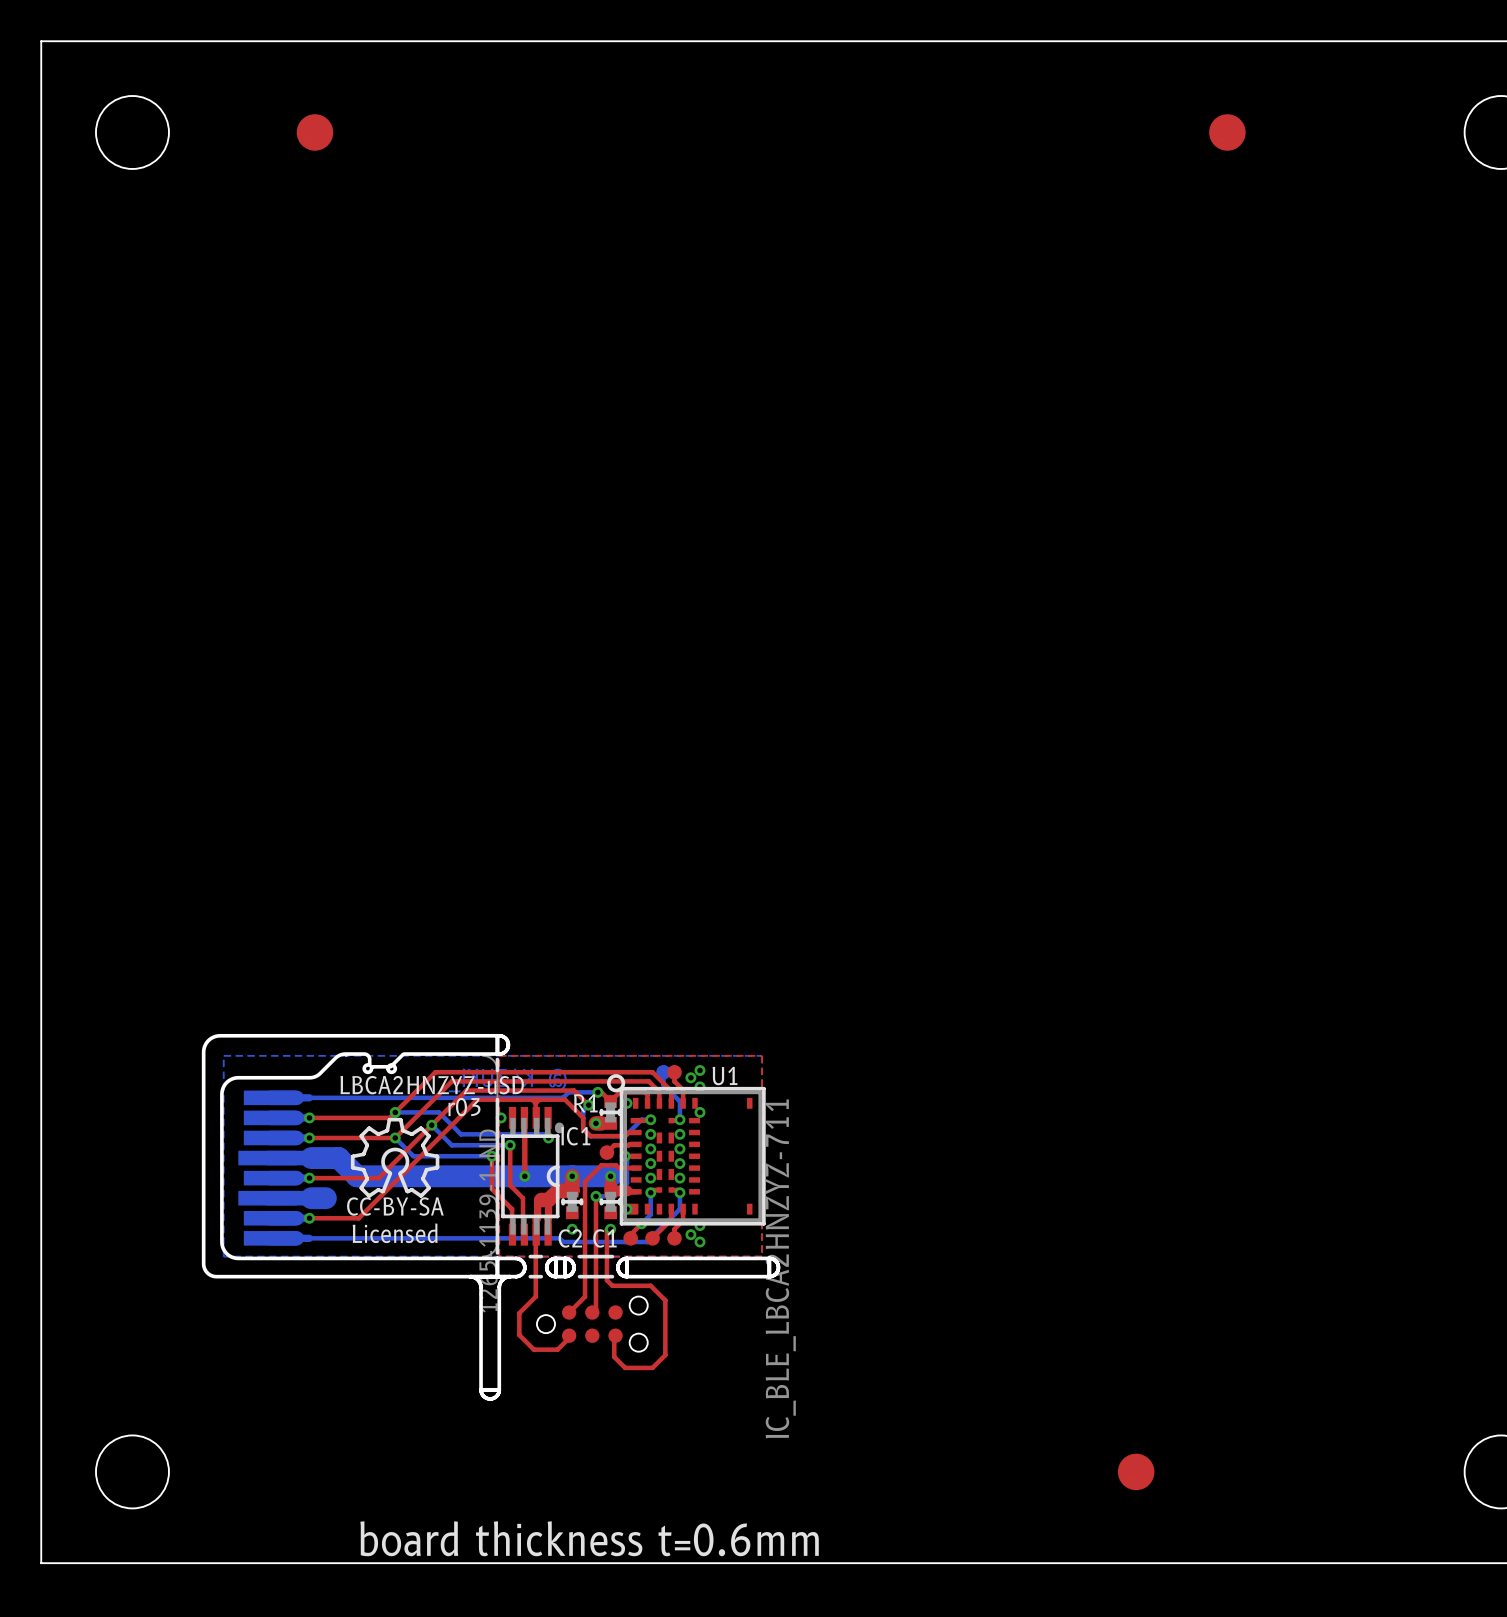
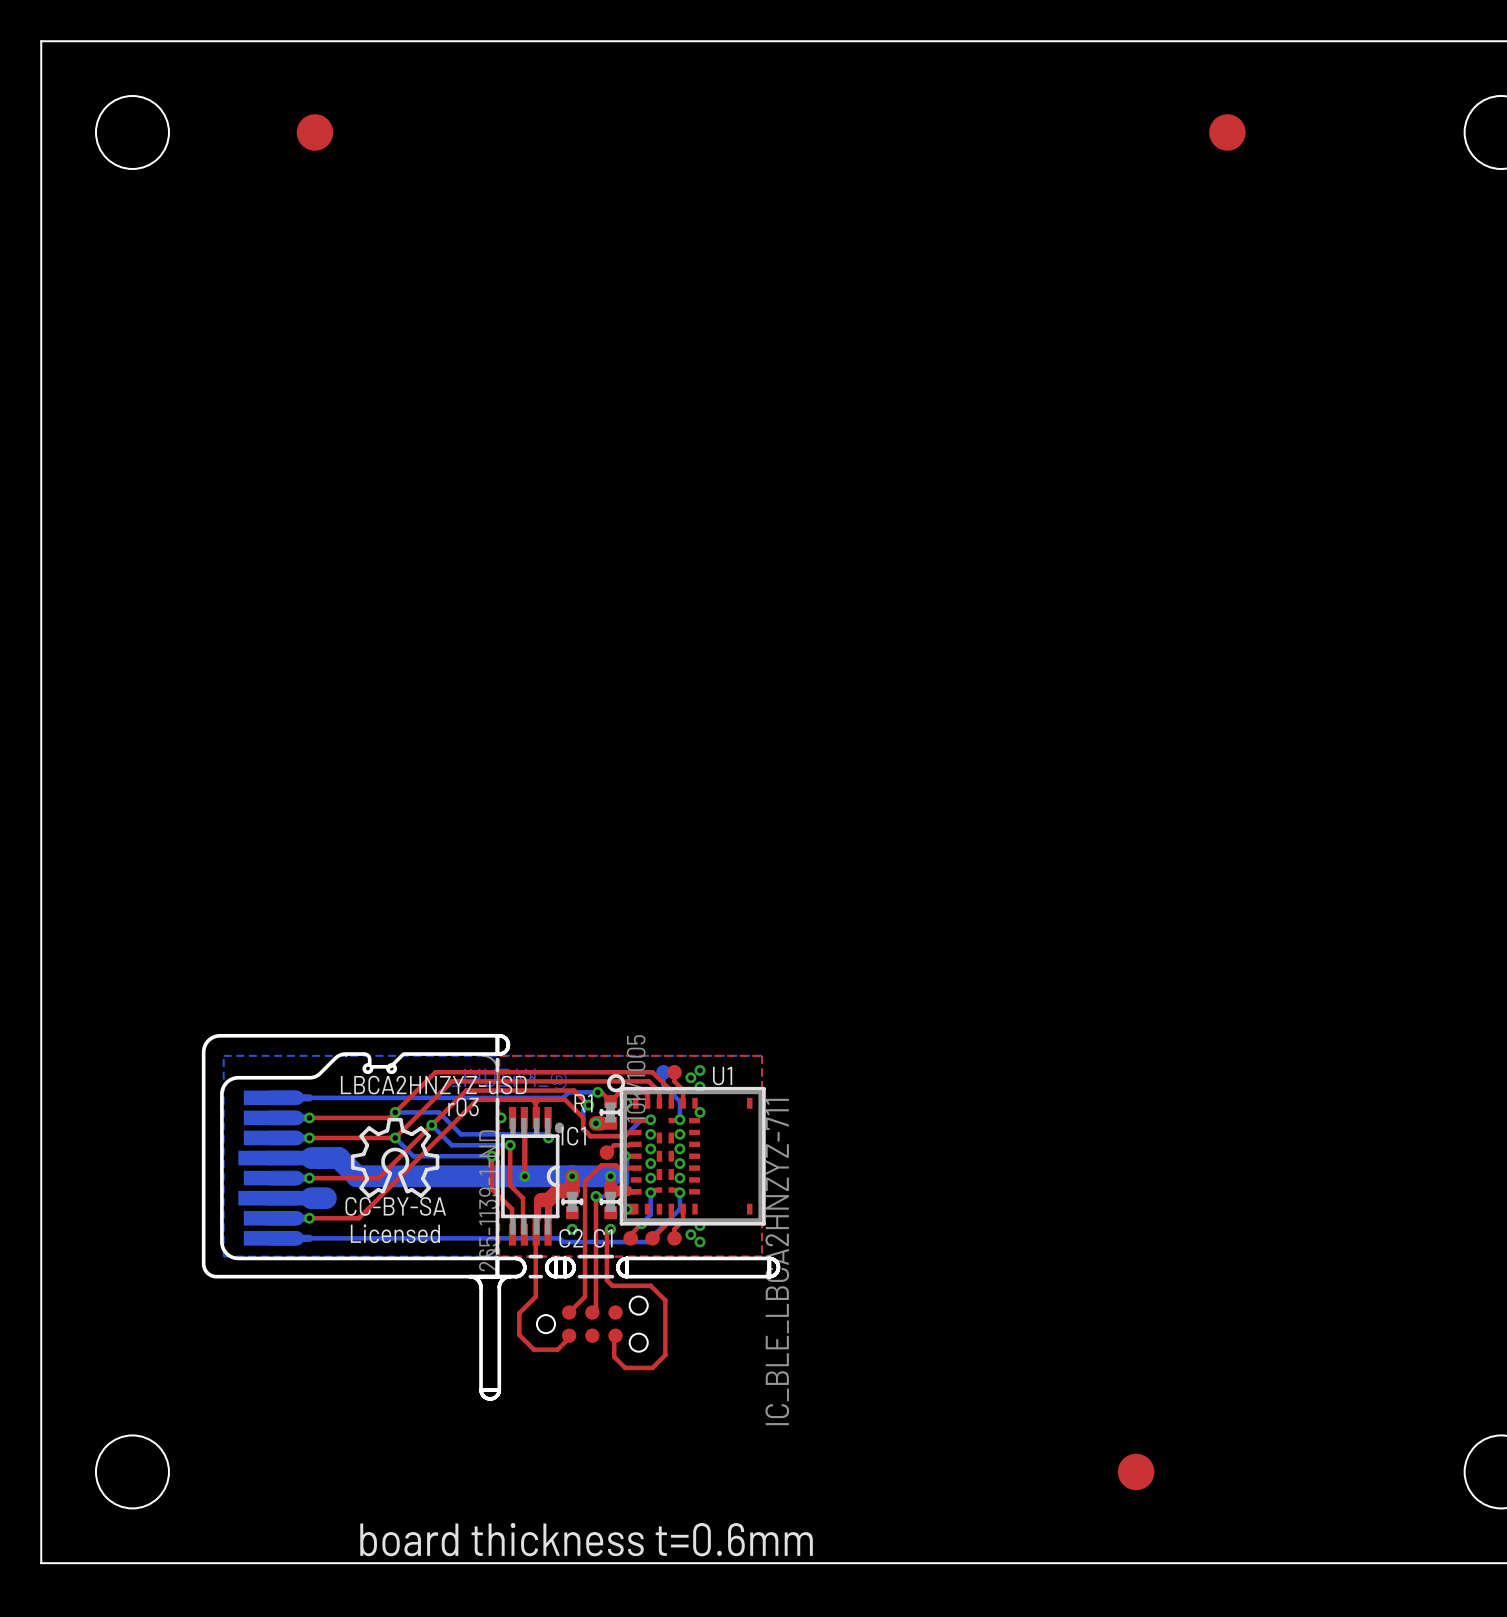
R1 value: none -> 10k/1005 (636, 1078)

